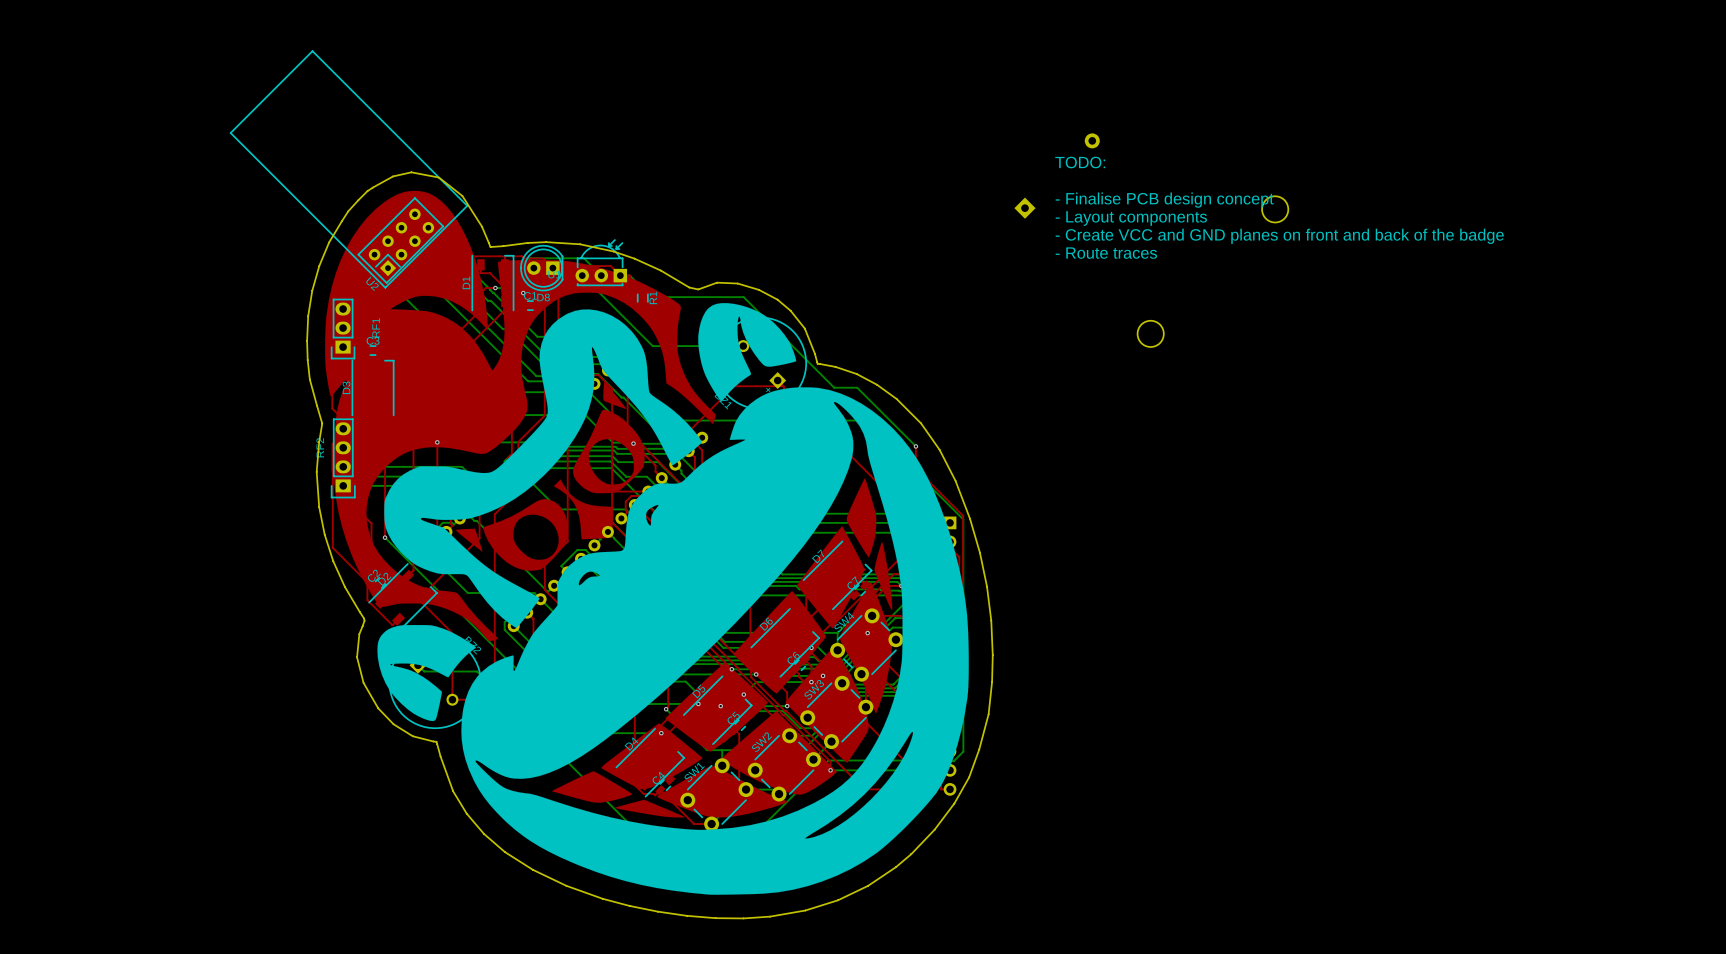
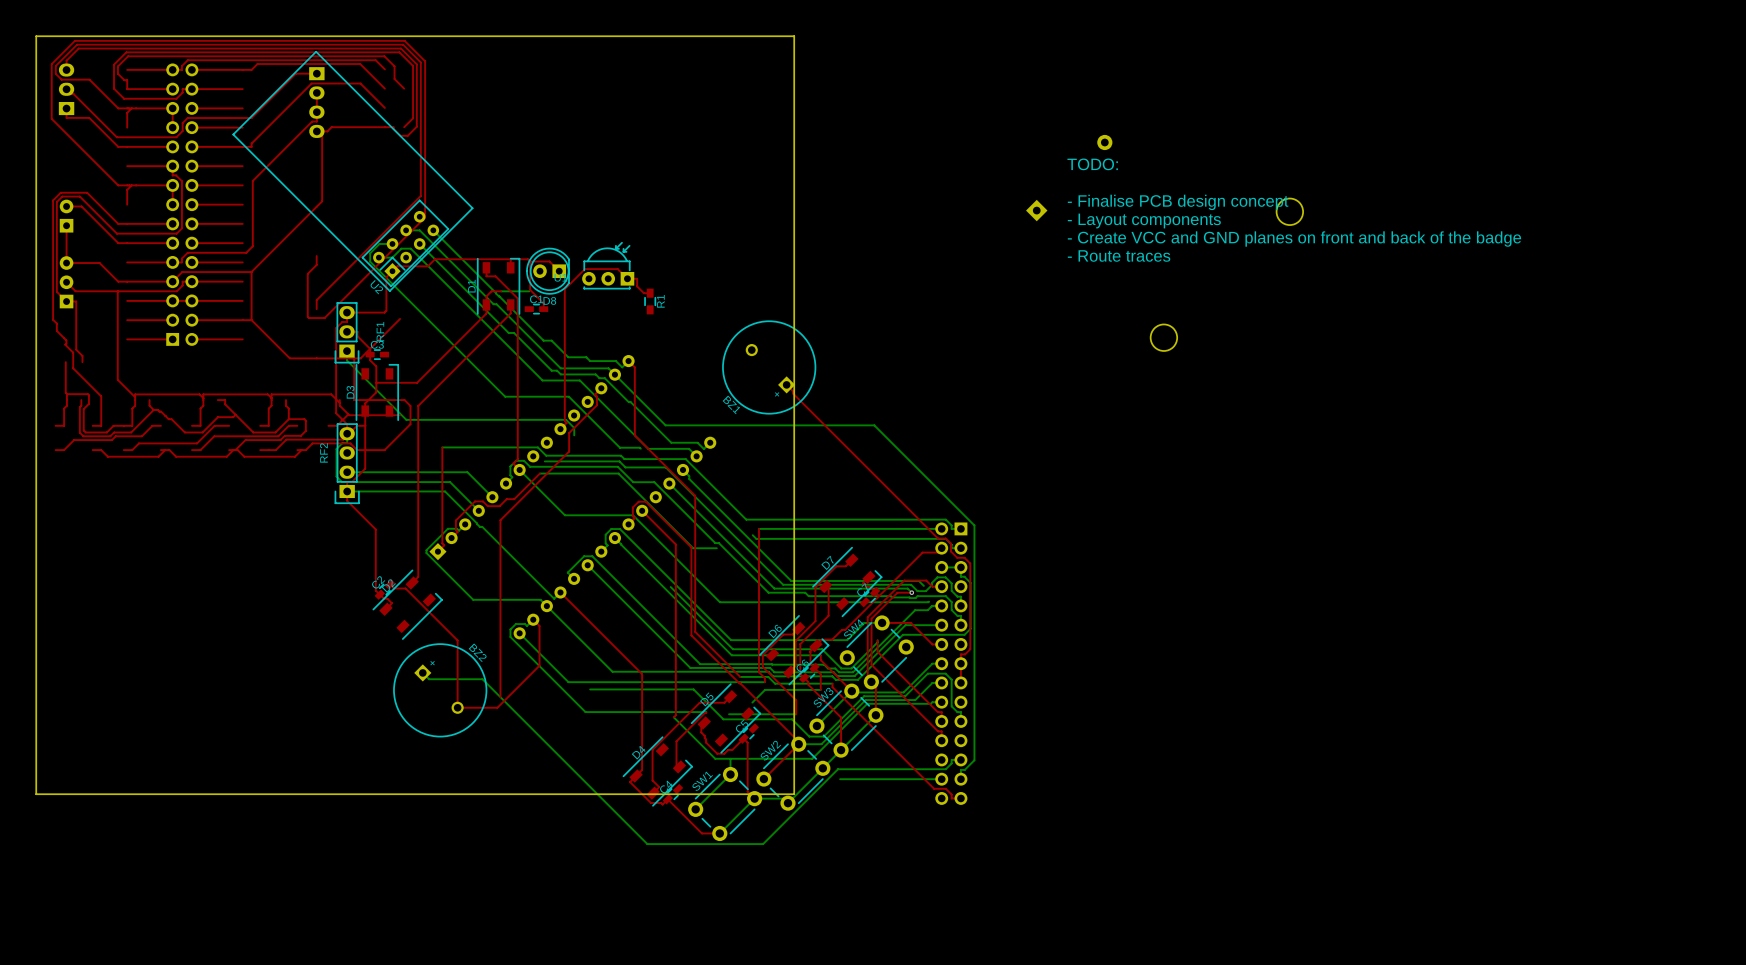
board edge: none -> (36, 36) (36, 794) (794, 794) (794, 36) (36, 36)
top track: none -> (384, 69) (375, 60) (187, 60) (181, 66) (181, 69) (127, 69)
top track: none -> (66, 70) (66, 60) (78, 48) (401, 48) (416, 64) (416, 126) (407, 135) (400, 135) (393, 127) (331, 127) (327, 131) (316, 131)
top track: none -> (191, 69) (251, 69) (257, 64) (360, 64) (384, 88)
top track: none -> (316, 73) (295, 73) (251, 118) (187, 118) (182, 123) (182, 131) (176, 137) (116, 137) (73, 93) (66, 93) (66, 89)
top track: none -> (404, 88) (394, 79) (394, 66) (384, 56) (128, 56) (117, 66) (117, 73) (124, 80) (127, 80) (127, 89) (172, 89)
part: none -> (66, 89)
top track: none -> (242, 89) (182, 89) (182, 92) (176, 98) (124, 98) (114, 88) (114, 64) (126, 52) (399, 52) (413, 65) (413, 118) (404, 127)
top track: none -> (316, 92) (316, 121) (312, 121) (252, 180) (252, 246) (246, 252) (187, 252) (181, 258) (181, 262) (127, 262)
part: none -> (316, 102)
top track: none -> (384, 107) (360, 83) (311, 83) (251, 143) (251, 146) (191, 146)
top track: none -> (66, 108) (66, 117) (89, 117) (118, 146) (172, 146)
top track: none -> (131, 108) (127, 112) (127, 127)
top track: none -> (191, 108) (242, 108)
top track: none -> (172, 127) (172, 108) (118, 108) (89, 79) (61, 79) (55, 73) (55, 65) (77, 44) (403, 44) (420, 62) (420, 196) (316, 300) (316, 309)
top track: none -> (191, 127) (242, 127)
top track: none -> (322, 131) (322, 201) (251, 271) (251, 320)
top track: none -> (127, 166) (172, 166) (172, 175) (176, 175) (181, 181) (181, 228) (176, 233) (116, 233) (79, 196) (62, 196) (56, 202) (56, 291) (66, 301) (76, 301) (76, 349) (82, 355) (82, 362)
top track: none -> (191, 166) (242, 166)
board edge: (411, 172) (438, 177) (462, 195) (481, 226) (490, 247) (546, 242) (580, 244) (613, 251) (634, 258) (660, 270) (689, 287) (698, 289) (717, 282) (737, 283) (758, 289) (777, 299) (790, 310) (804, 328) (817, 363) (835, 366) (856, 374) (876, 384) (896, 399) (921, 423) (939, 449) (955, 480) (969, 518) (987, 586) (992, 655) (988, 714) (969, 777) (954, 803) (934, 829) (911, 854) (868, 885) (837, 900) (805, 910) (770, 916) (743, 918) (715, 918) (657, 911) (602, 898) (566, 885) (532, 869) (504, 852) (484, 833) (466, 813) (453, 791) (436, 741) (412, 736) (393, 724) (378, 708) (363, 682) (357, 657) (359, 634) (364, 618) (345, 587) (333, 561) (324, 534) (319, 507) (316, 471) (322, 423) (309, 379) (307, 341) (308, 316) (312, 290) (319, 265) (329, 242) (348, 211) (372, 187) (393, 176) (411, 172) -> none
top track: none -> (131, 185) (127, 189) (127, 204)
top track: none -> (191, 185) (242, 185)
drawing: [325, 190, 969, 895] -> none
top track: none -> (172, 204) (172, 185) (118, 185) (51, 118) (51, 64) (74, 40) (404, 40) (425, 61) (425, 217) (324, 318) (307, 317) (307, 273) (316, 264) (316, 256)
part: none -> (182, 204)
top track: none -> (191, 204) (242, 204)
top track: none -> (66, 206) (81, 206) (118, 243) (172, 243)
part: none -> (66, 216)
top track: none -> (172, 223) (118, 223) (87, 192) (60, 192) (53, 200) (53, 319) (56, 323) (56, 330) (66, 340) (65, 344) (73, 352) (73, 368) (101, 396) (101, 425) (92, 425)
top track: none -> (191, 223) (242, 223)
top track: none -> (66, 225) (66, 263) (99, 263) (118, 281) (172, 281) (182, 272) (251, 272)
top track: none -> (191, 243) (242, 243)
bottom track: (401, 254) (528, 381) (569, 381) -> none
top track: none -> (191, 262) (242, 262)
top track: (533, 268) (544, 279) (544, 415) (518, 441) (518, 455) (522, 460) (522, 468) (517, 473) (506, 471) (500, 478) -> none
bottom track: (552, 268) (562, 268) (569, 275) (582, 275) (652, 346) (743, 346) -> none
bottom track: (601, 275) (583, 258) (530, 258) (523, 265) (523, 293) -> none
bottom track: (620, 275) (629, 275) (651, 297) (743, 297) (834, 387) (857, 387) (915, 446) -> none
top track: none -> (242, 281) (182, 281) (182, 285) (176, 291) (75, 291) (66, 282)
part: none -> (66, 282)
top track: none -> (117, 291) (117, 379) (135, 397)
via: (495, 288) -> none
via: (523, 293) -> none
top track: none -> (127, 300) (242, 300)
top track: none -> (400, 318) (360, 358) (289, 358) (251, 320)
top track: none -> (127, 320) (172, 320)
top track: none -> (191, 320) (251, 320)
top track: none -> (127, 339) (172, 339)
top track: none -> (191, 339) (242, 339)
top track: none -> (354, 358) (354, 400) (404, 400) (410, 405) (410, 424) (384, 450) (357, 450) (350, 443) (312, 443) (305, 450) (297, 450)
top track: none -> (65, 362) (66, 394)
top track: (361, 369) (361, 378) (354, 384) (354, 432) (348, 438) (338, 438) (332, 443) (332, 547) (367, 582) (367, 600) (392, 625) (398, 619) -> none
top track: (569, 381) (575, 375) (598, 375) (612, 388) (612, 522) (663, 573) (663, 580) -> none
top track: (783, 386) (734, 386) (671, 448) -> none
top track: none -> (66, 394) (66, 405) (64, 408) (64, 425) (55, 425)
top track: none -> (66, 394) (88, 395) (88, 403) (83, 409) (83, 430) (85, 432) (106, 432) (113, 425) (132, 425) (132, 408) (135, 405) (135, 394) (199, 394) (203, 398)
top track: none -> (271, 398) (267, 394) (203, 394) (203, 405) (200, 408) (200, 425) (191, 425)
top track: none -> (81, 400) (79, 432) (83, 436) (110, 436) (114, 432) (131, 432) (153, 409)
top track: none -> (149, 400) (149, 405) (153, 409)
top track: none -> (217, 400) (225, 400) (225, 404) (235, 414)
top track: none -> (285, 400) (285, 405) (288, 408) (288, 419)
top track: none -> (339, 400) (339, 405) (349, 415) (400, 415)
top track: none -> (339, 402) (331, 394) (271, 394) (271, 405) (268, 408) (268, 425) (260, 425)
top track: none -> (153, 409) (161, 411) (168, 419) (171, 419) (184, 432) (202, 432) (217, 417) (233, 417) (235, 414)
top track: (385, 406) (385, 537) -> none
top track: none -> (348, 414) (336, 425) (328, 425)
top track: none -> (235, 414) (253, 432) (275, 432) (288, 419)
top track: none -> (288, 419) (304, 419) (305, 430) (300, 435) (284, 435) (280, 440) (245, 440) (235, 450)
top track: none -> (160, 425) (152, 425) (141, 436) (115, 436) (111, 440) (74, 440) (64, 450) (55, 450)
top track: none -> (229, 425) (214, 425) (197, 443) (138, 443) (132, 450) (123, 450)
top track: none -> (297, 425) (288, 425) (278, 436) (214, 436) (200, 450) (191, 450)
top track: none -> (365, 425) (357, 425) (343, 439) (286, 439) (275, 450) (260, 450)
top track: (567, 430) (567, 541) (544, 564) (544, 589) (583, 628) (583, 681) -> none
bottom track: (540, 437) (549, 446) (671, 448) -> none
top track: (702, 437) (695, 443) (702, 450) (702, 586) (705, 590) (705, 625) (750, 670) (751, 677) (864, 789) (931, 789) -> none
via: (437, 442) -> none
top track: (633, 443) (655, 465) (655, 471) (661, 478) -> none
via: (633, 443) -> none
top track: none -> (92, 450) (101, 450) (107, 456) (158, 456) (165, 450)
top track: none -> (160, 450) (169, 450) (176, 456) (226, 456) (233, 450)
top track: none -> (229, 450) (237, 450) (244, 456) (294, 456) (301, 450)
top track: (915, 446) (915, 468) (963, 515) (963, 675) (953, 685) (950, 685) (950, 694) -> none
via: (915, 446) -> none
top track: (688, 451) (694, 457) (694, 625) (830, 761) (830, 770) -> none
top track: (612, 491) (648, 491) -> none
top track: (473, 505) (479, 511) (479, 538) (418, 599) -> none
bottom track: (385, 537) (580, 733) (661, 733) -> none
via: (385, 537) -> none
bottom track: (837, 632) (837, 650) -> none
via: (867, 633) -> none
via: (811, 647) -> none
via: (731, 669) -> none
via: (756, 674) -> none
via: (823, 675) -> none
via: (811, 682) -> none
via: (743, 694) -> none
via: (698, 703) -> none
via: (720, 706) -> none
via: (787, 706) -> none
via: (666, 709) -> none
via: (661, 733) -> none
via: (830, 770) -> none

